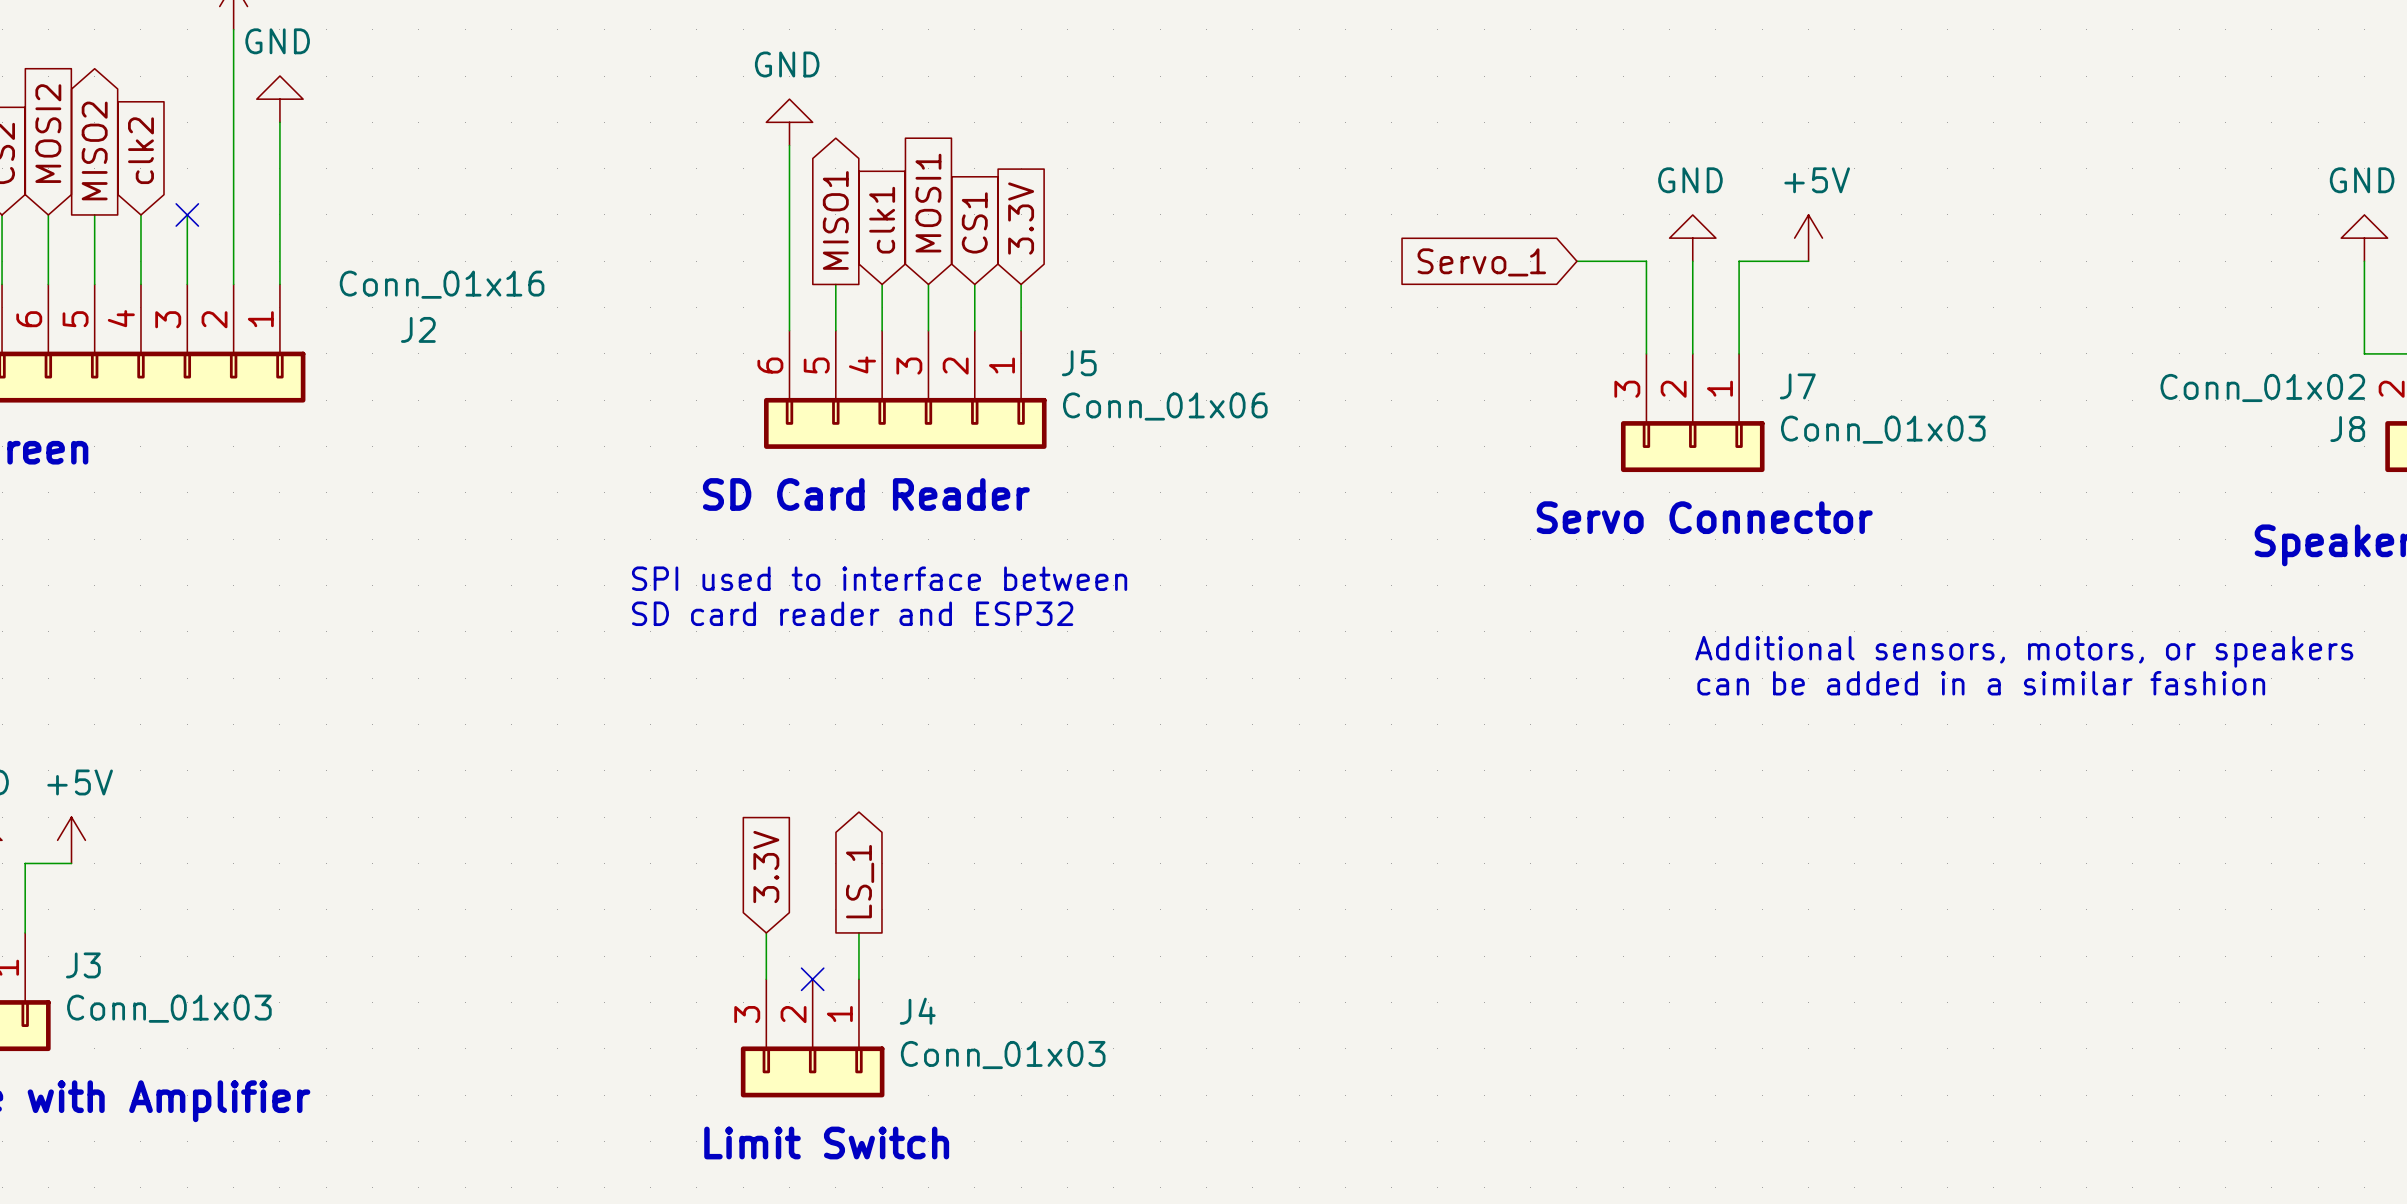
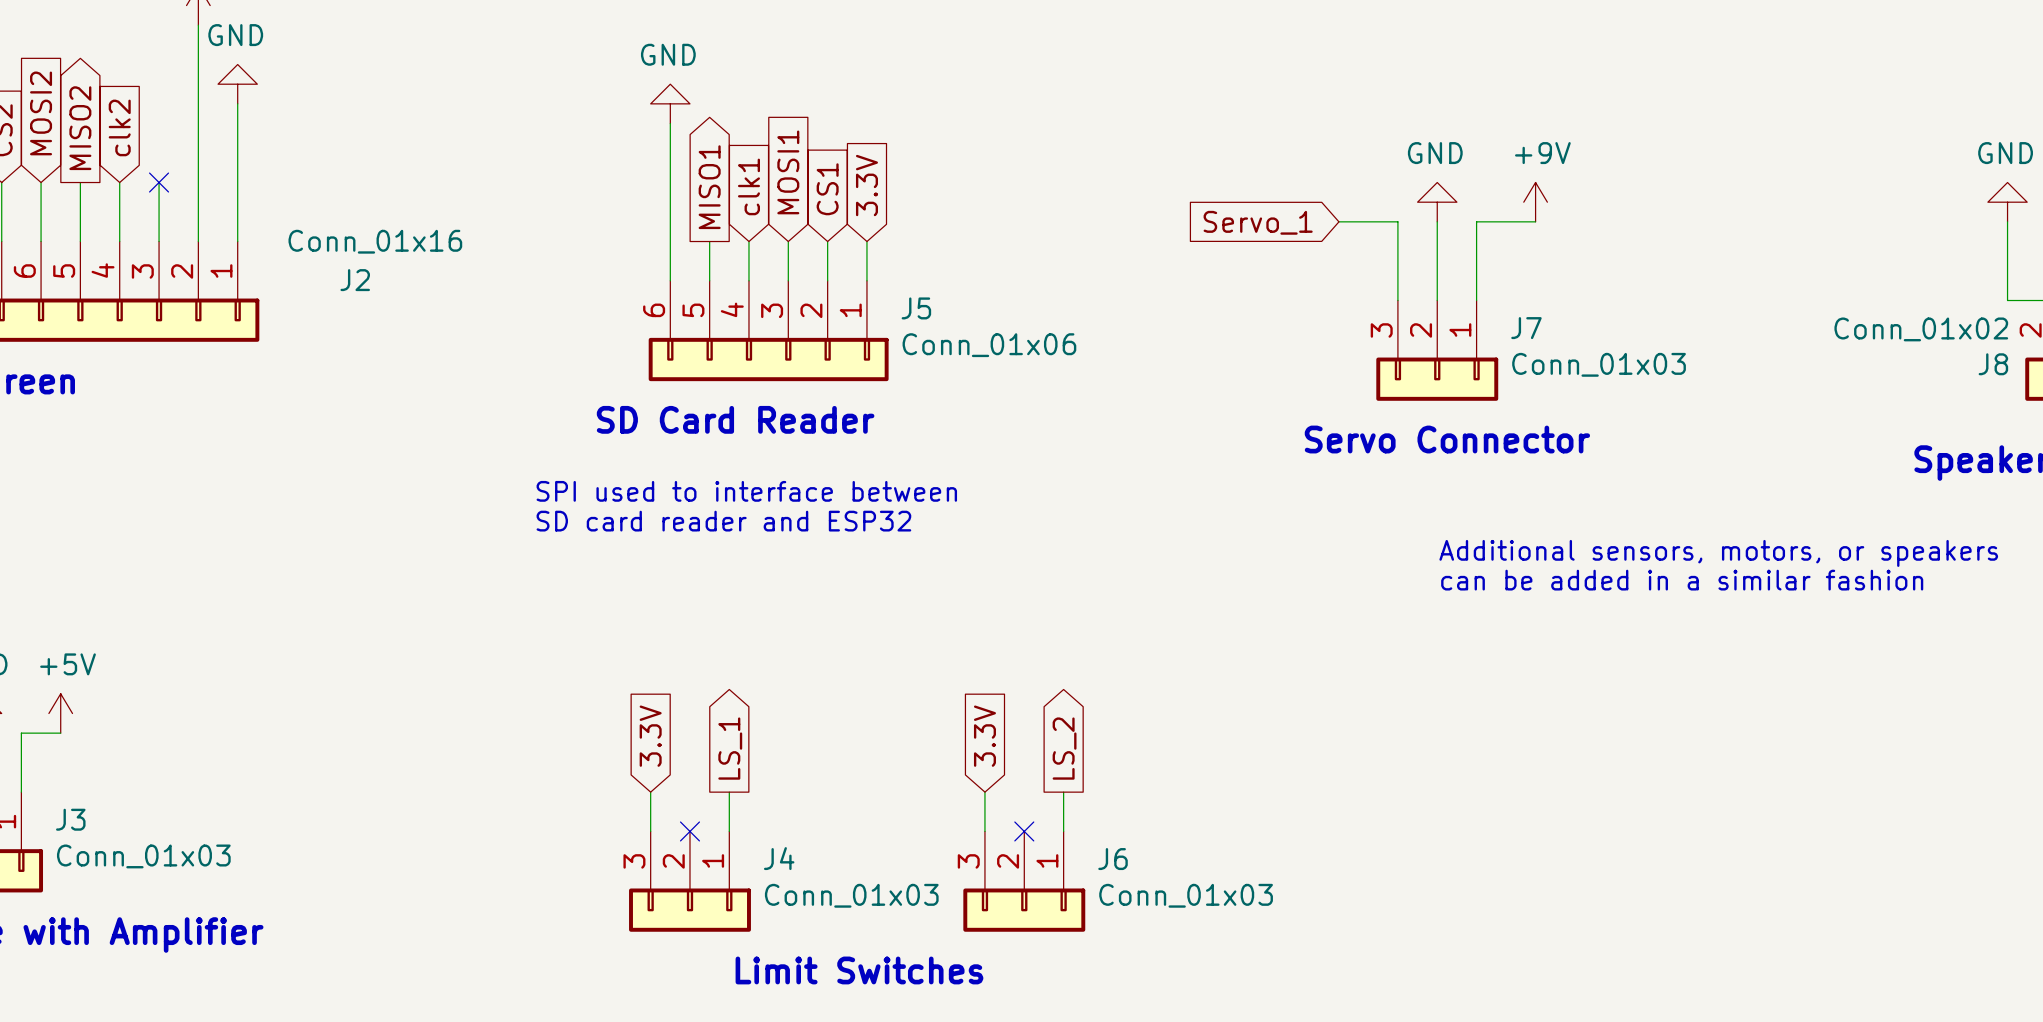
power symbol: +5V (1808, 238) -> +9V (1535, 202)
global label: none -> 3.3V (984, 736)
global label: none -> LS_2 (1064, 748)
wire: none -> (984, 792) (984, 831)
wire: none -> (1063, 792) (1063, 831)
no-connect mark: none -> (1024, 831)
J6: none -> Conn_01x03 (1024, 881)
text: Limit Switch (826, 1142) -> Limit Switches (859, 970)

